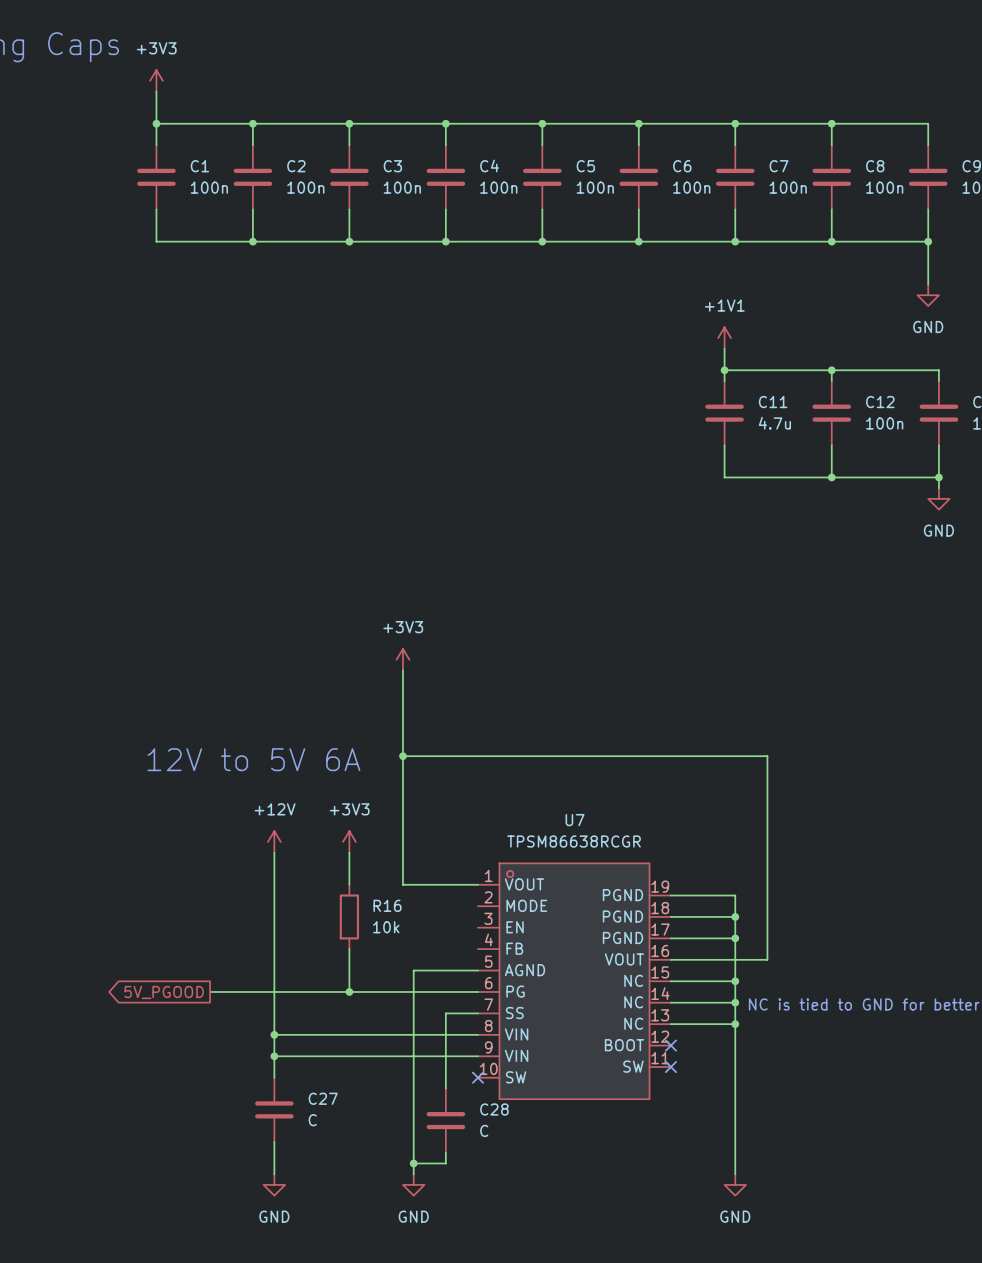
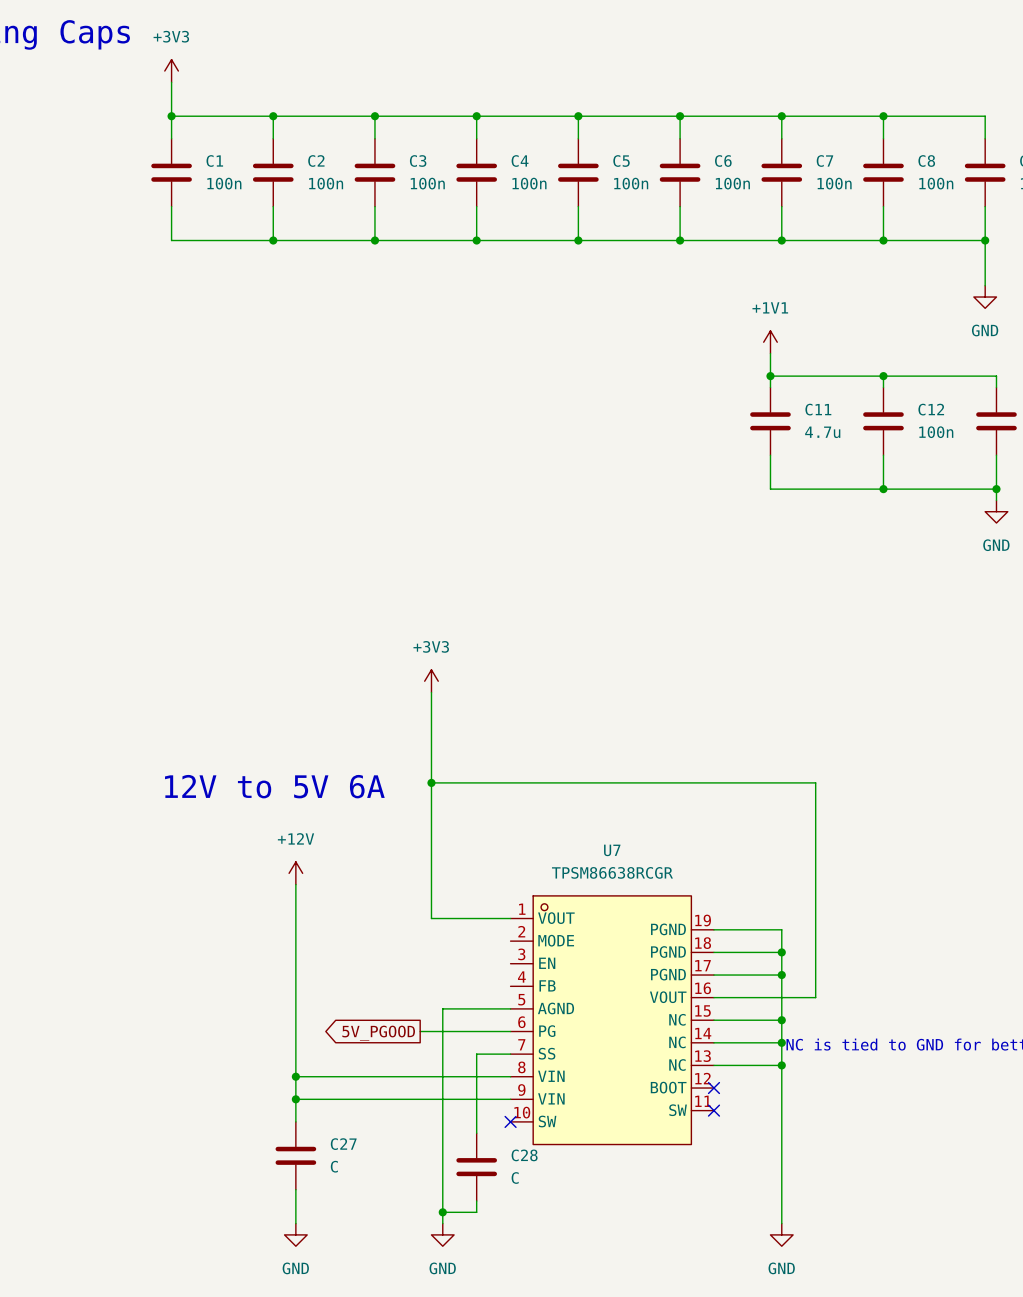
power symbol: +3V3 (349, 841) -> none
wire: (349, 852) (349, 884) -> none
R16: 10k (349, 916) -> none
wire: (349, 949) (349, 991) -> none
wire: (210, 991) (392, 991) -> none
junction: (349, 991) -> none
global label position: 5V_PGOOD (164, 992) -> 5V_PGOOD (378, 1033)

